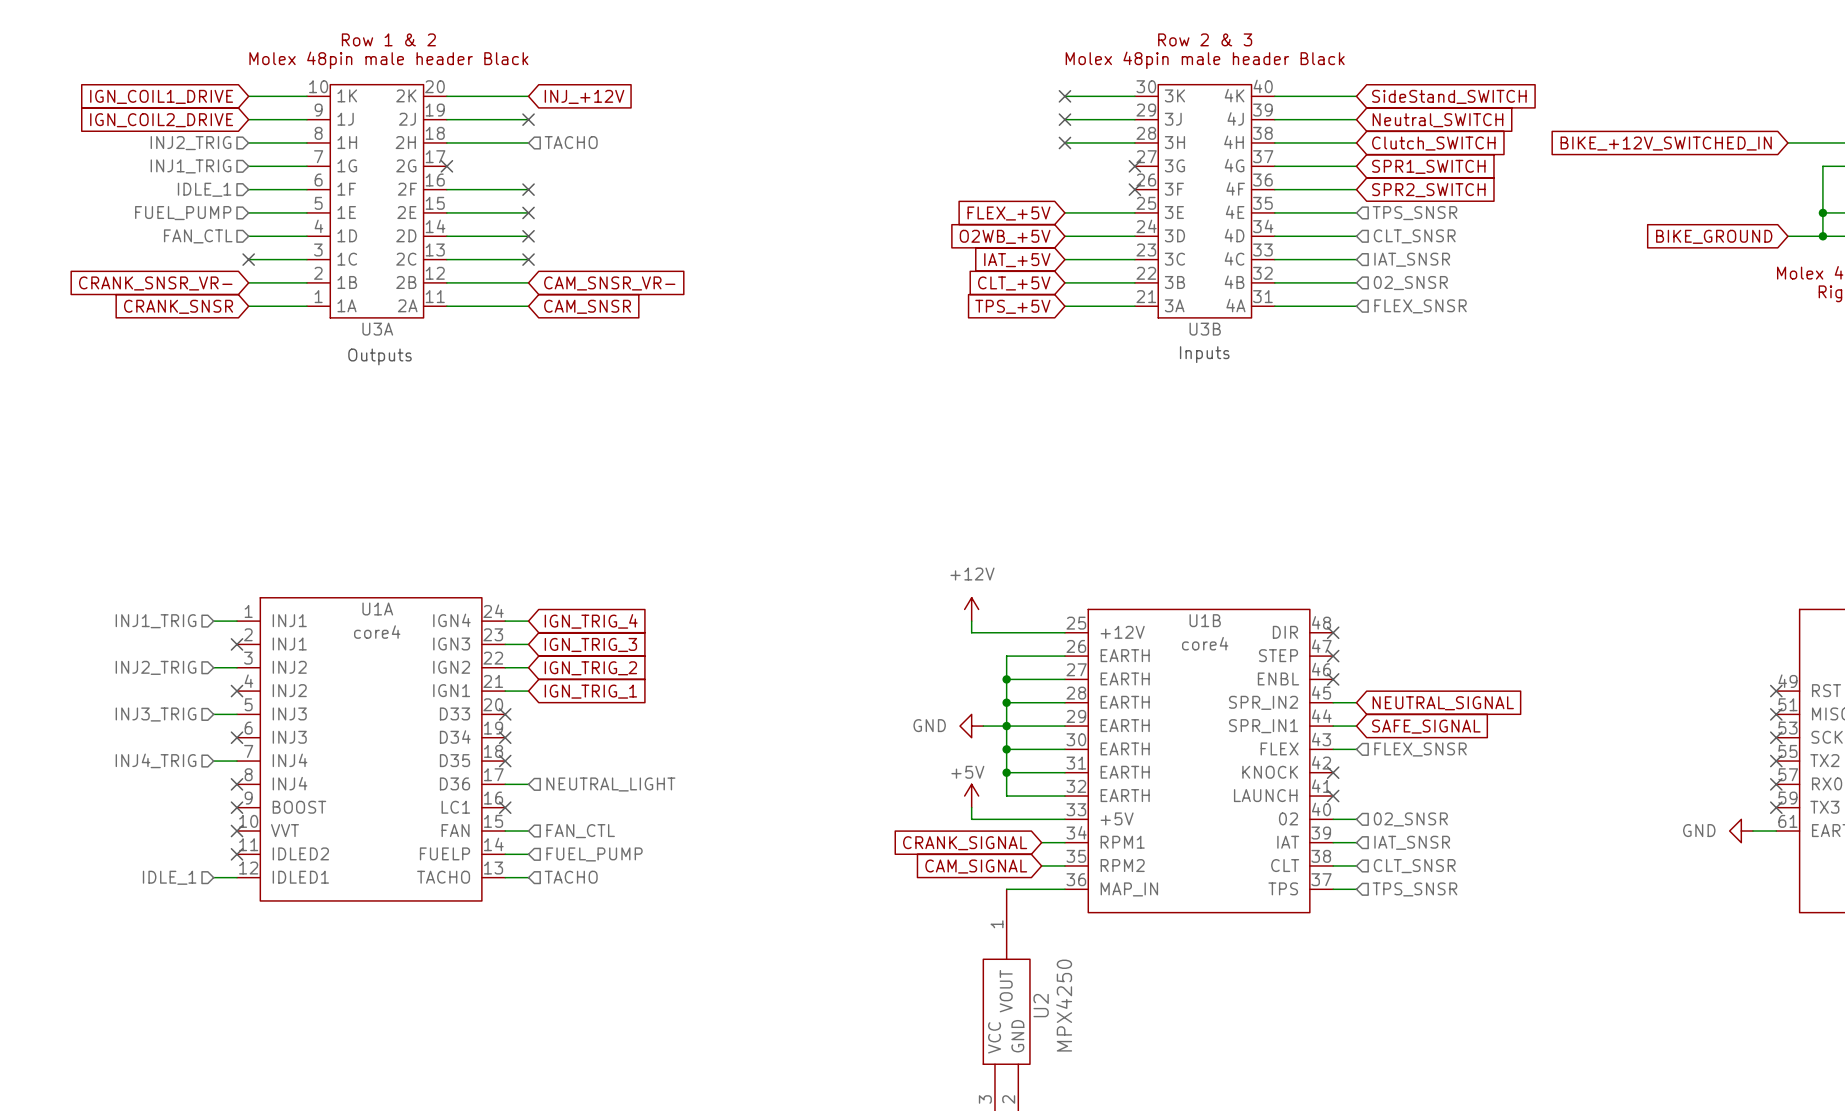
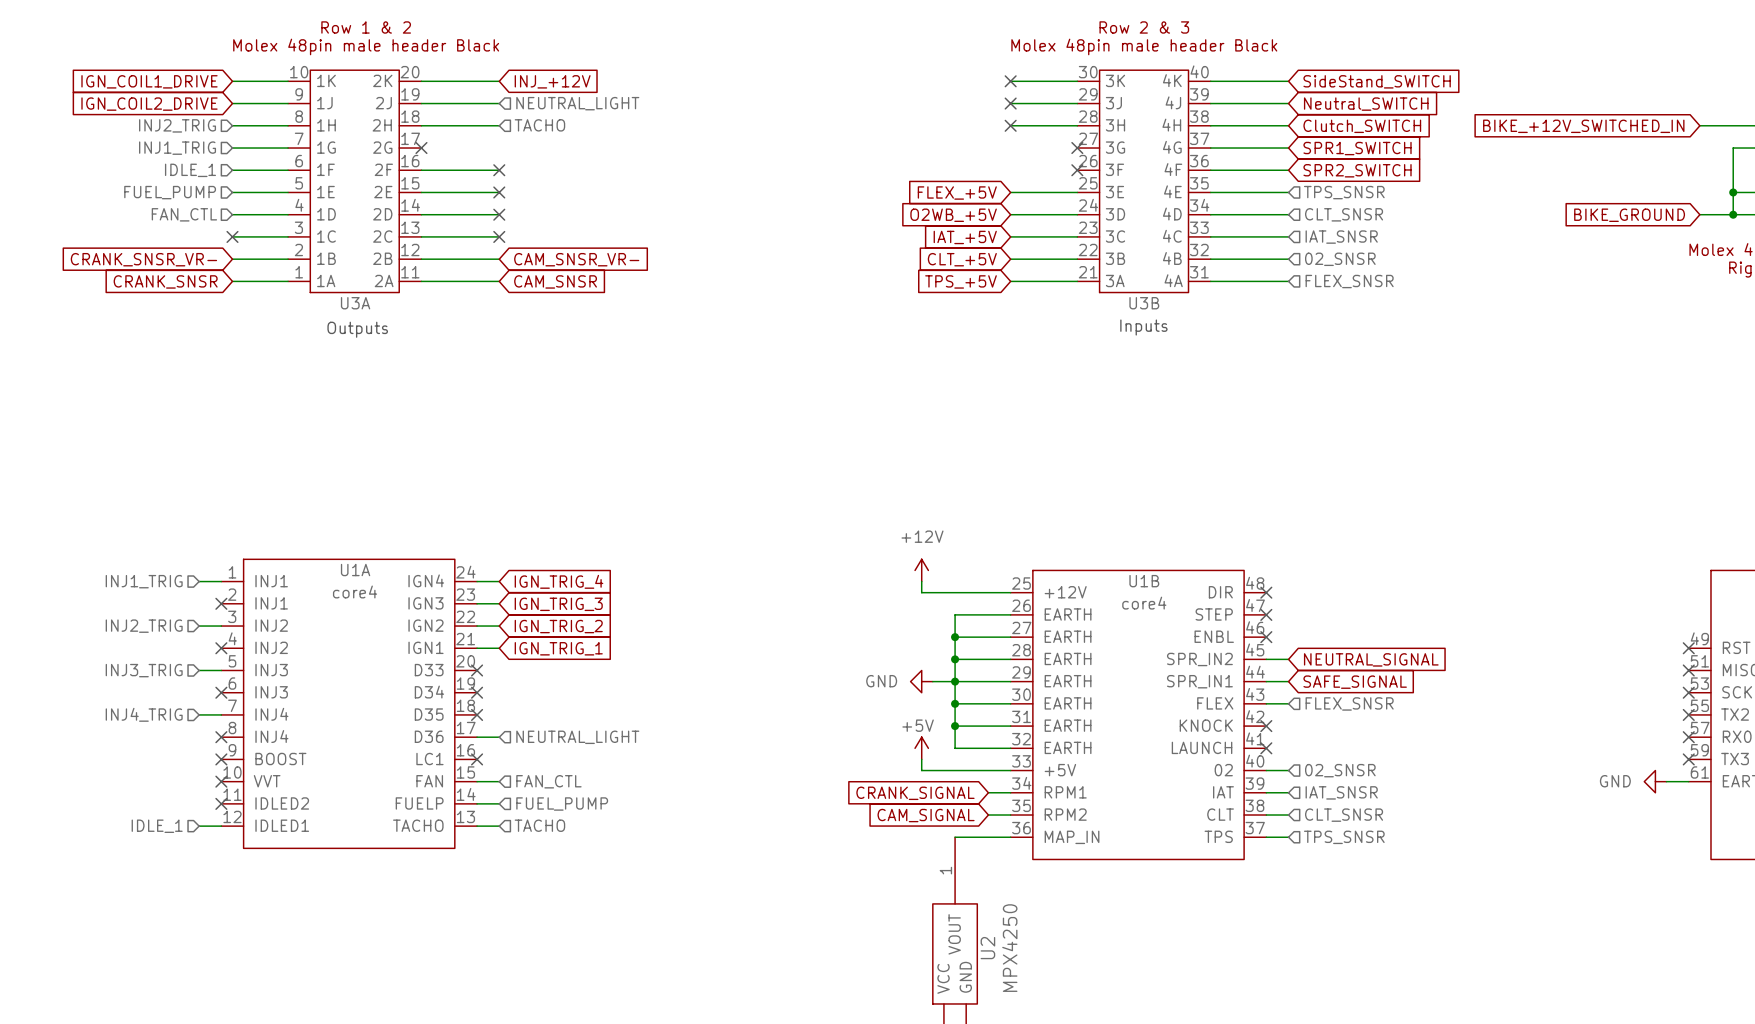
no-connect mark: (528, 119) -> none
hierarchical label: none -> NEUTRAL_LIGHT (577, 103)

